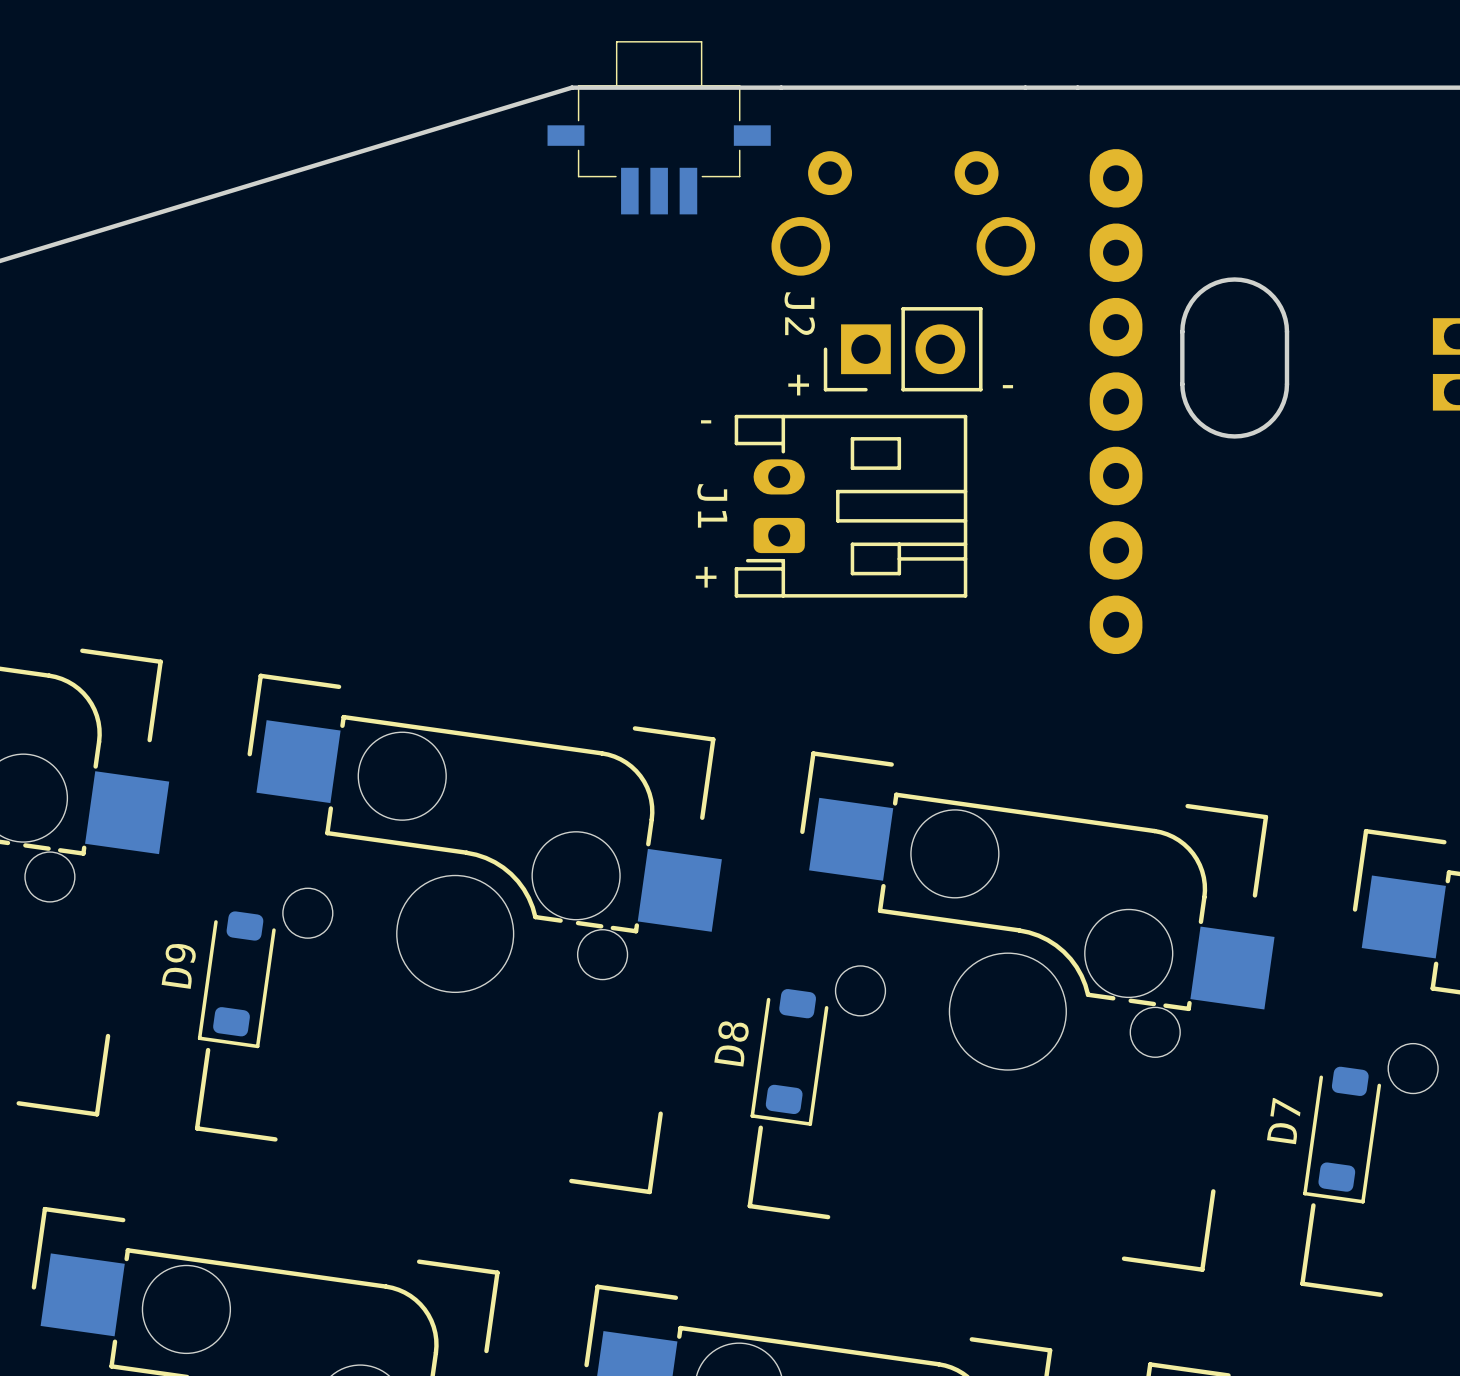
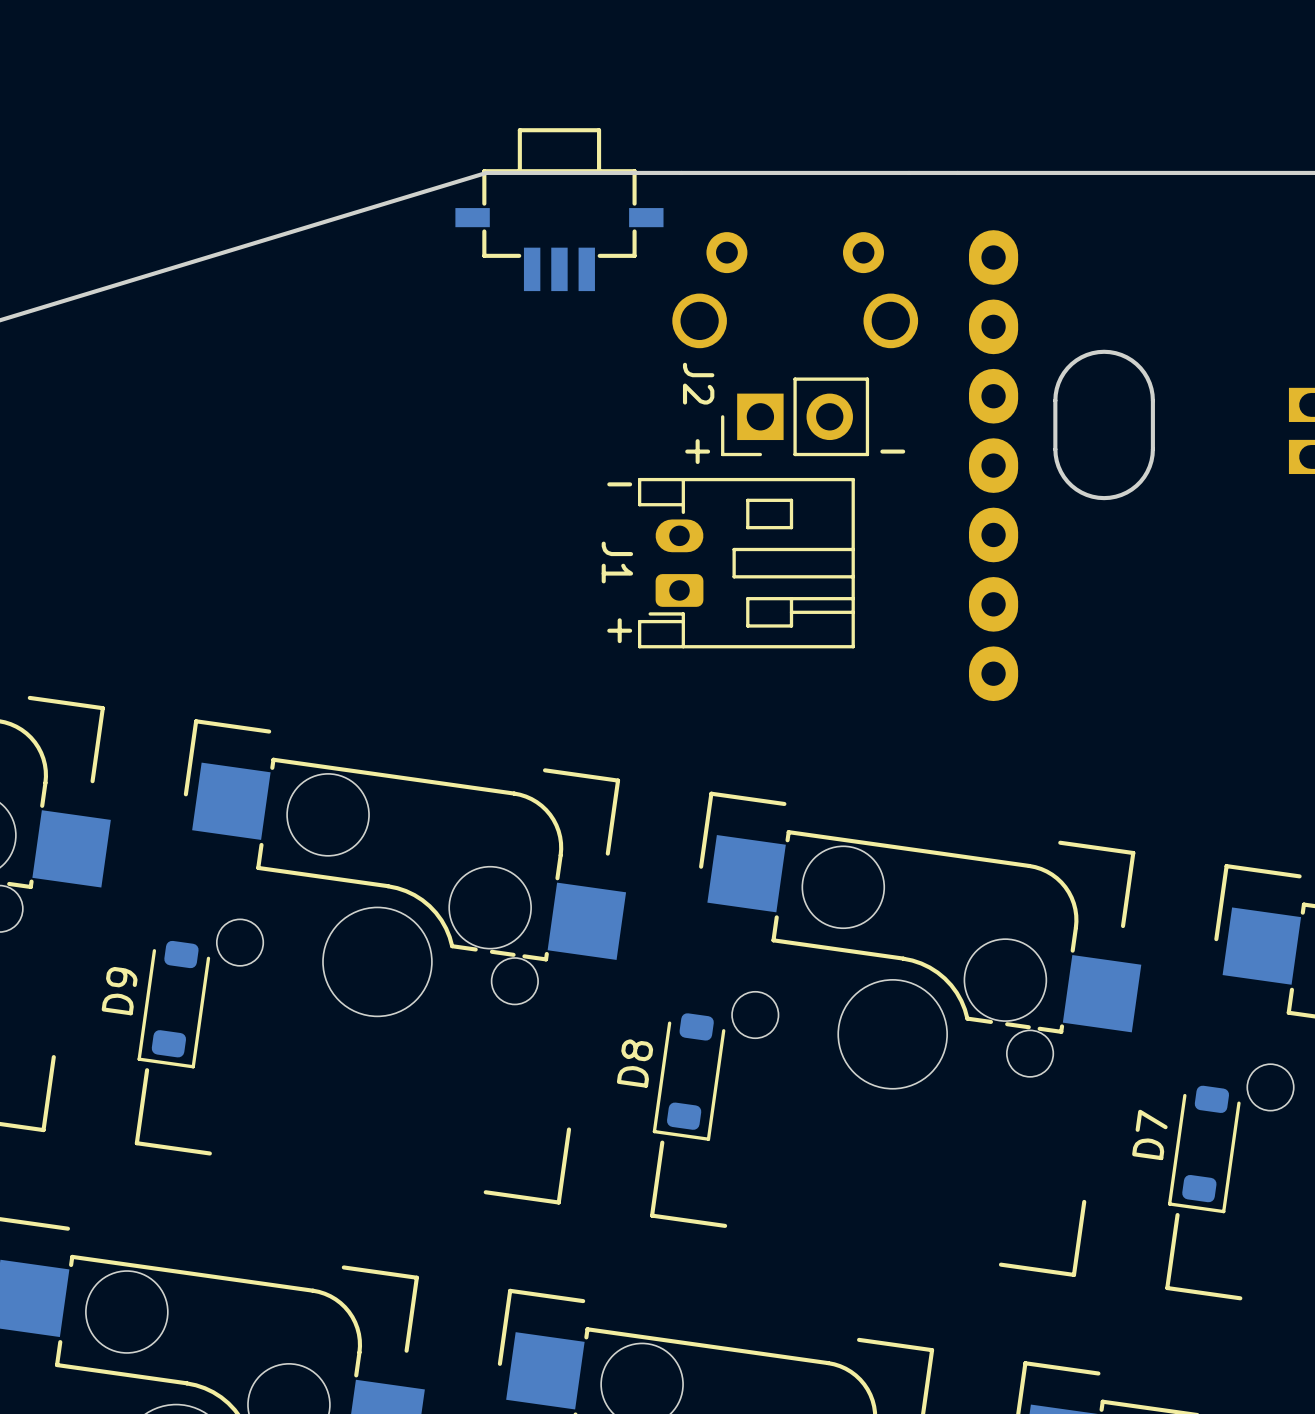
part footprint: [547, 41, 771, 215] -> [455, 128, 664, 292]

